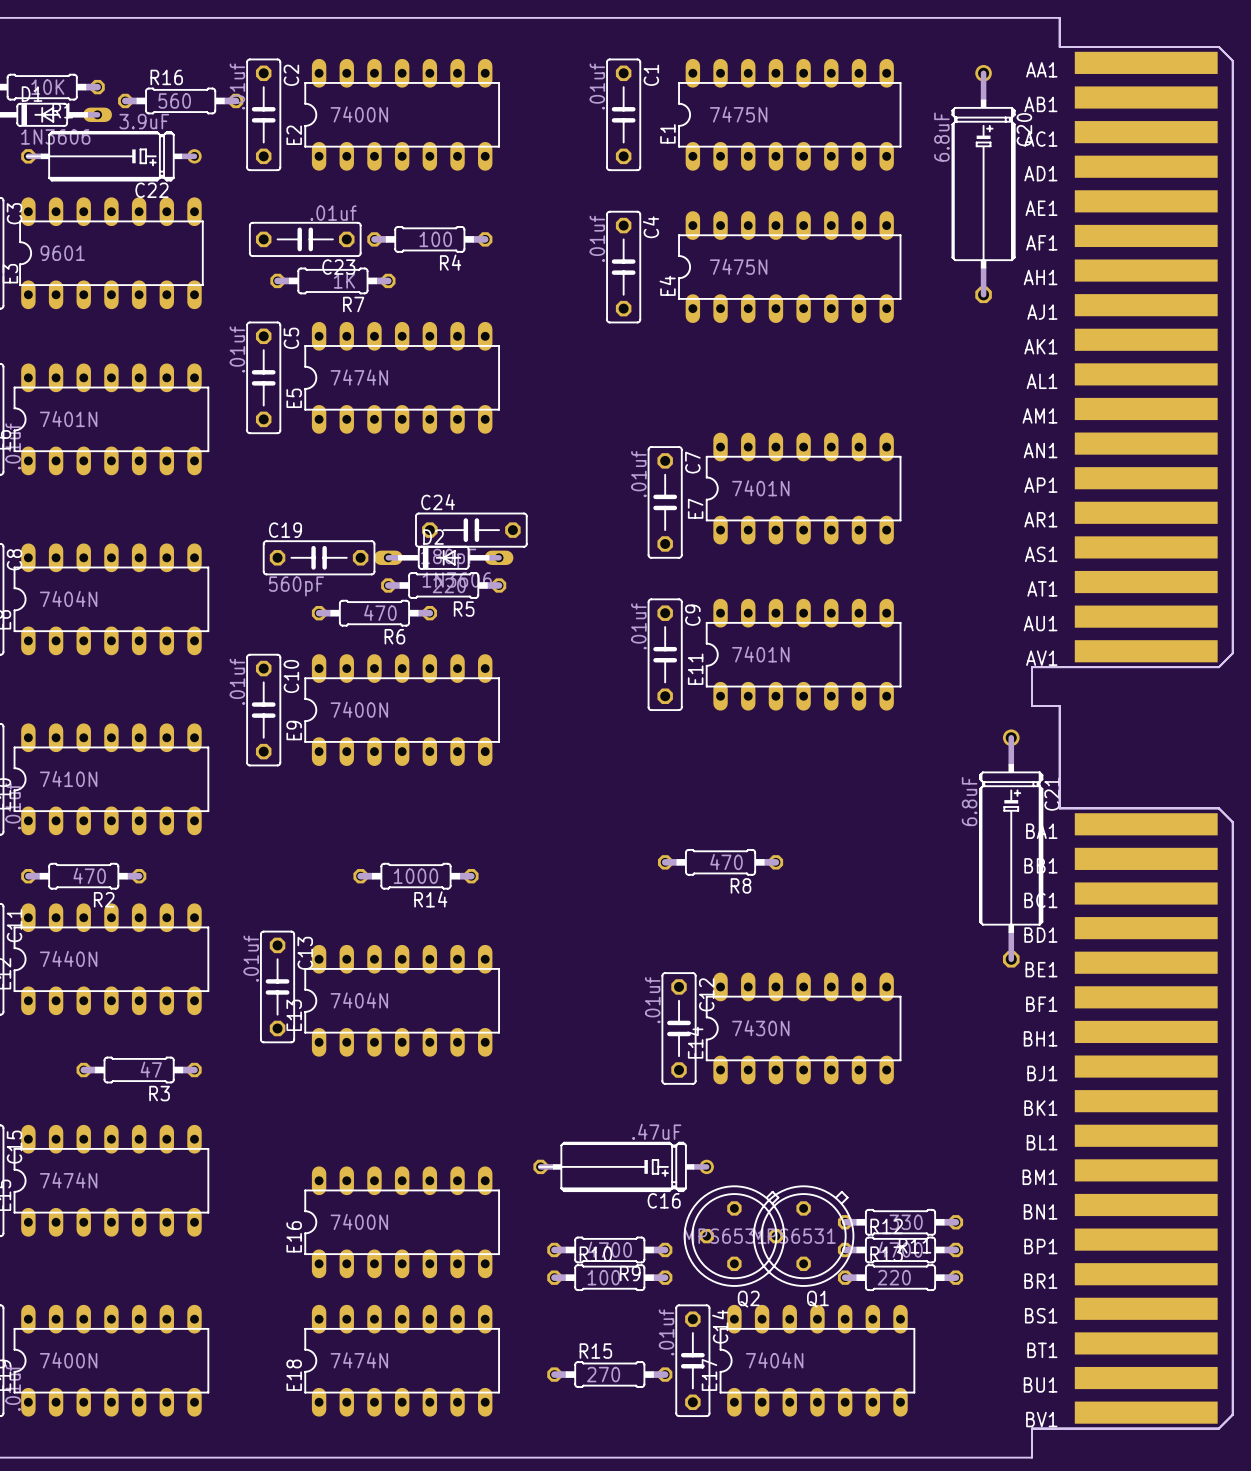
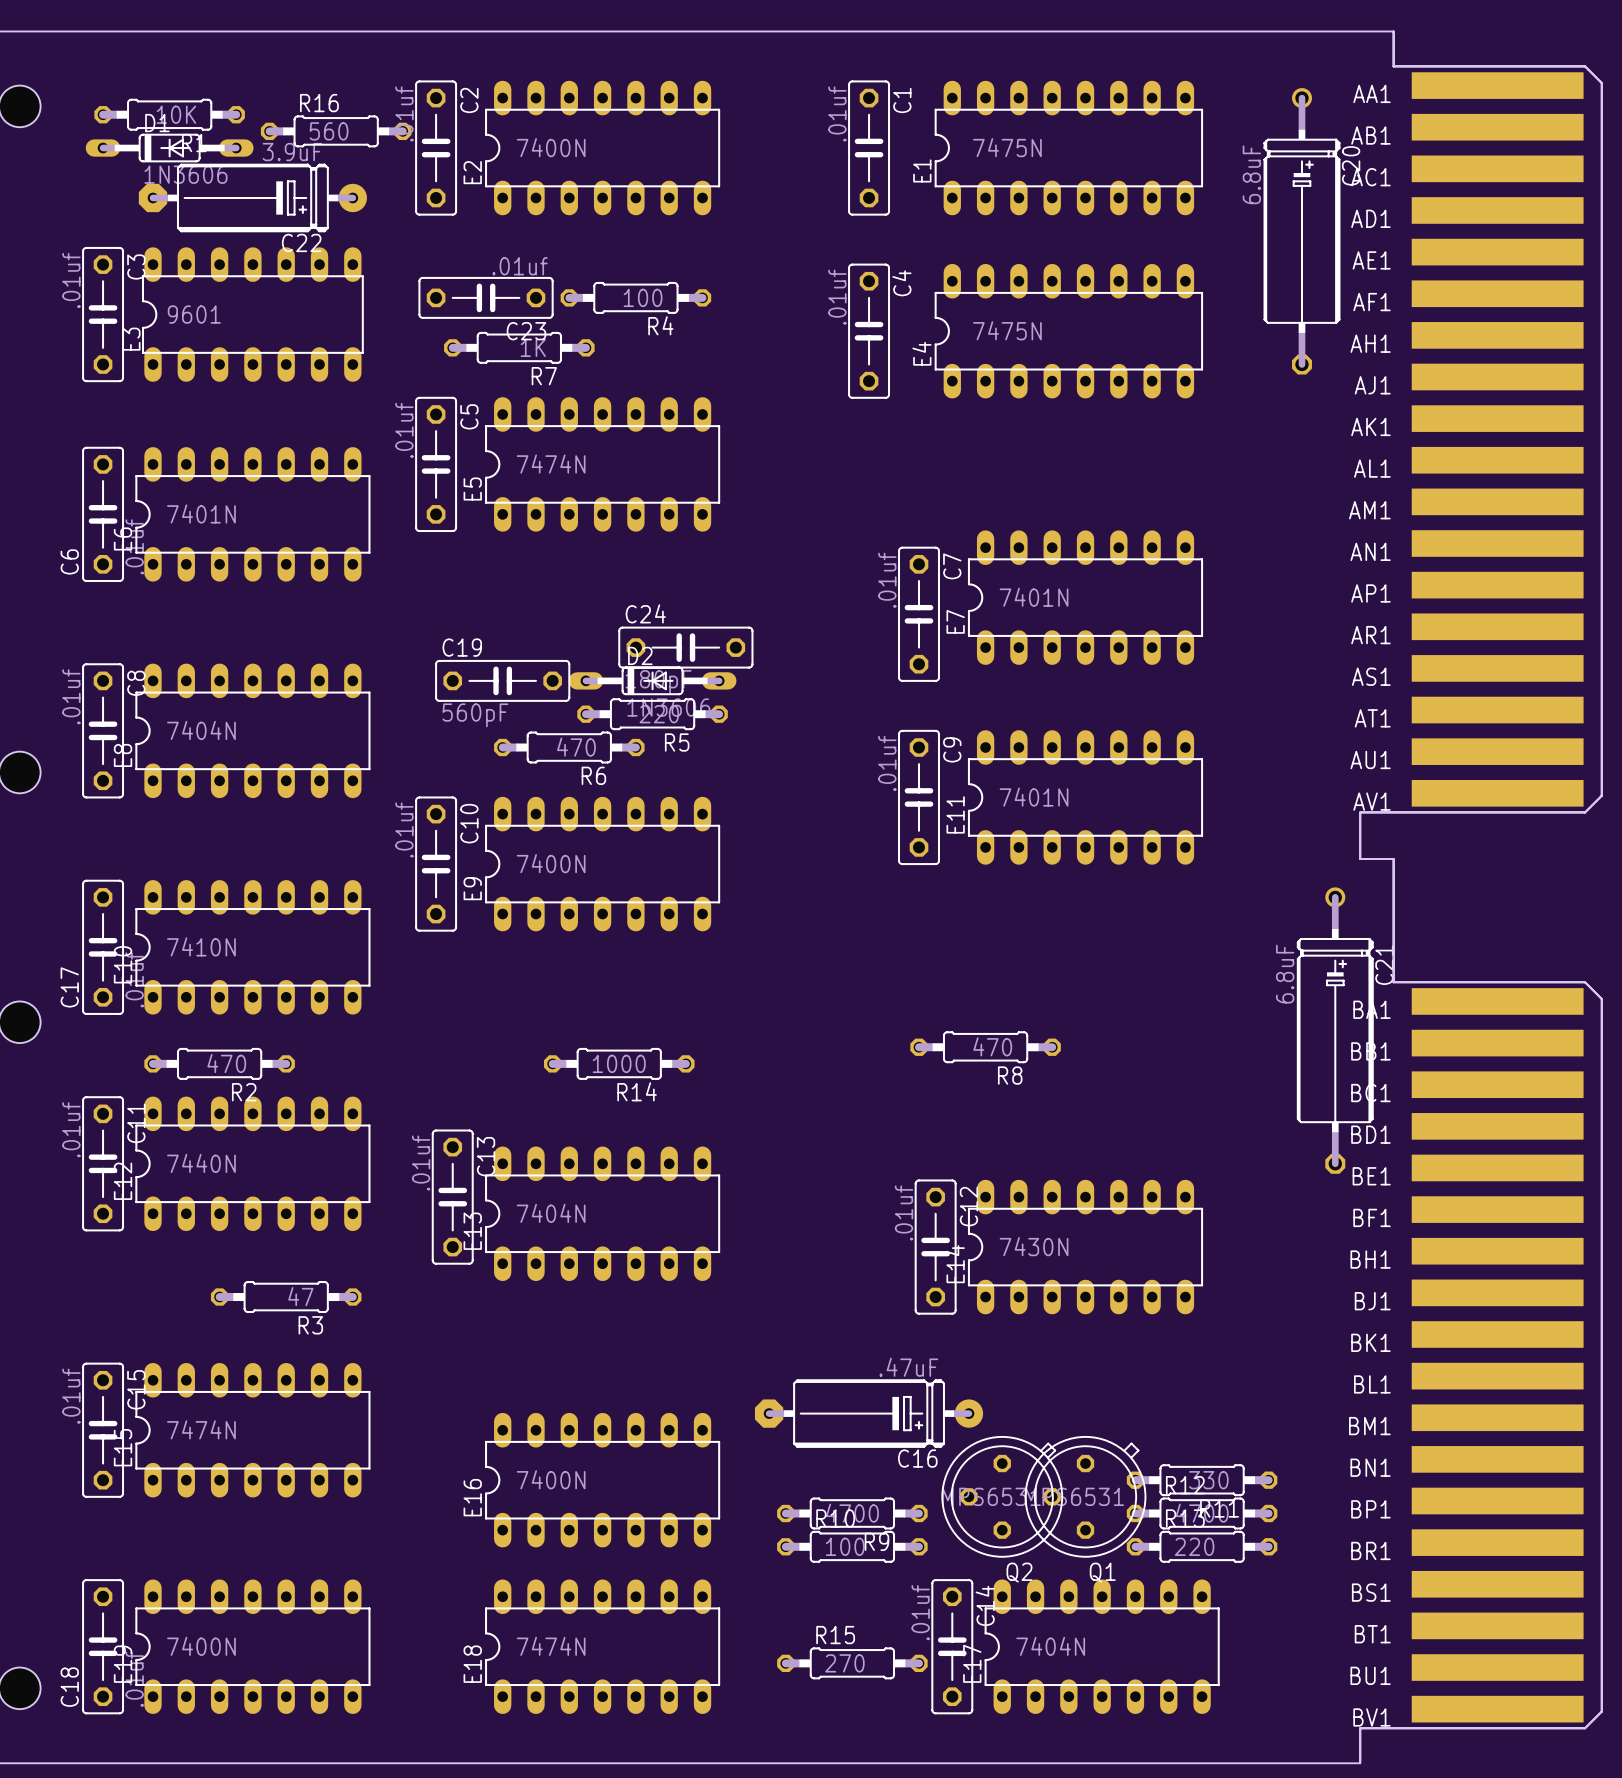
C22 footprint: [21, 131, 202, 182] -> [138, 163, 367, 233]
C16 footprint: [533, 1141, 714, 1192] -> [754, 1379, 984, 1448]

